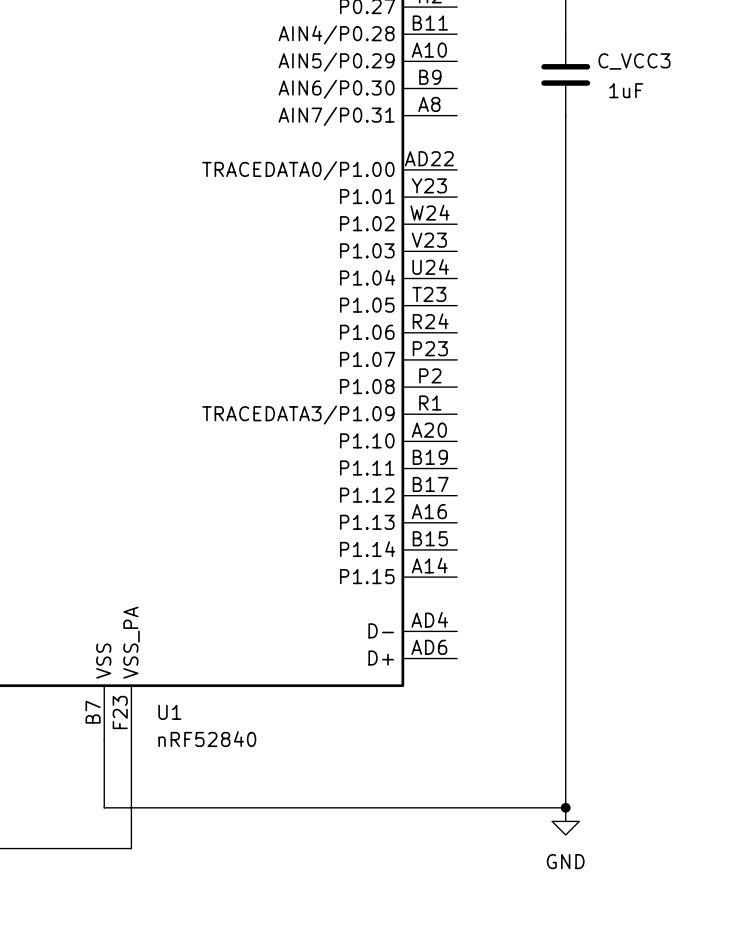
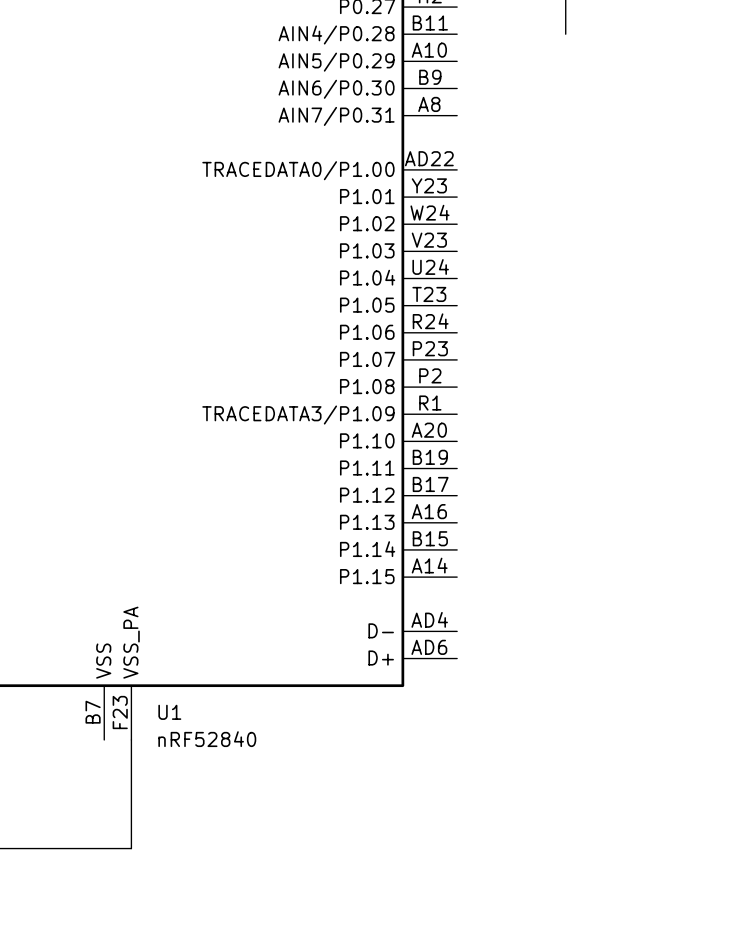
C_VCC3: 1uF (565, 74) -> none
wire: (565, 115) (565, 807) (104, 807) (104, 739) -> none
junction: (565, 807) -> none
power symbol: GND (565, 821) -> none

